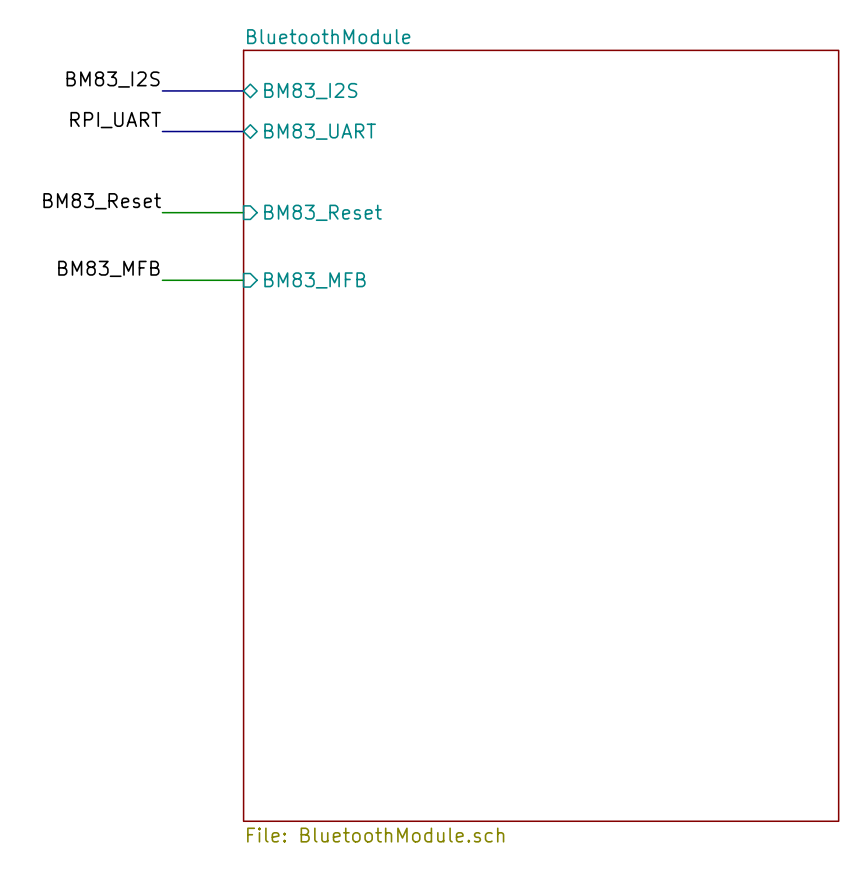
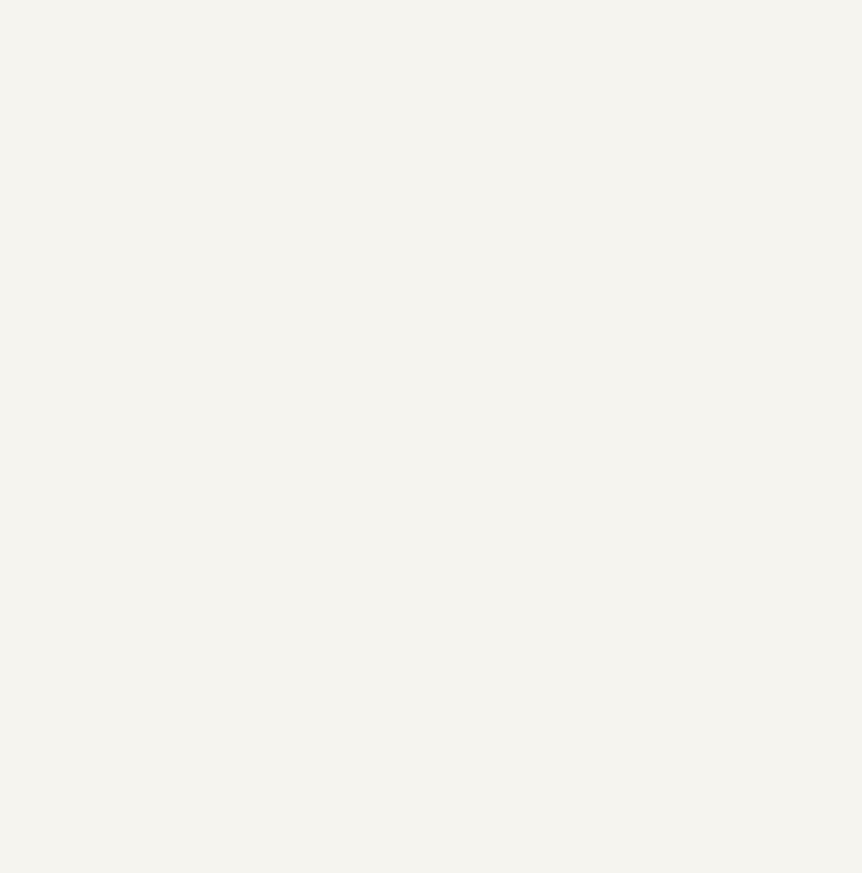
label: BM83_I2S (113, 79) -> none
bus: (162, 90) (243, 90) -> none
sheet pin: BM83_I2S (310, 91) -> none
label: RPI_UART (115, 120) -> none
bus: (162, 131) (243, 131) -> none
sheet pin: BM83_UART (320, 131) -> none
label: BM83_Reset (102, 201) -> none
wire: (162, 212) (243, 212) -> none
sheet pin: BM83_Reset (323, 212) -> none
label: BM83_MFB (108, 268) -> none
wire: (162, 280) (243, 280) -> none
sheet pin: BM83_MFB (314, 280) -> none
sheet BluetoothModule: File: BluetoothModule.sch (541, 435) -> none

